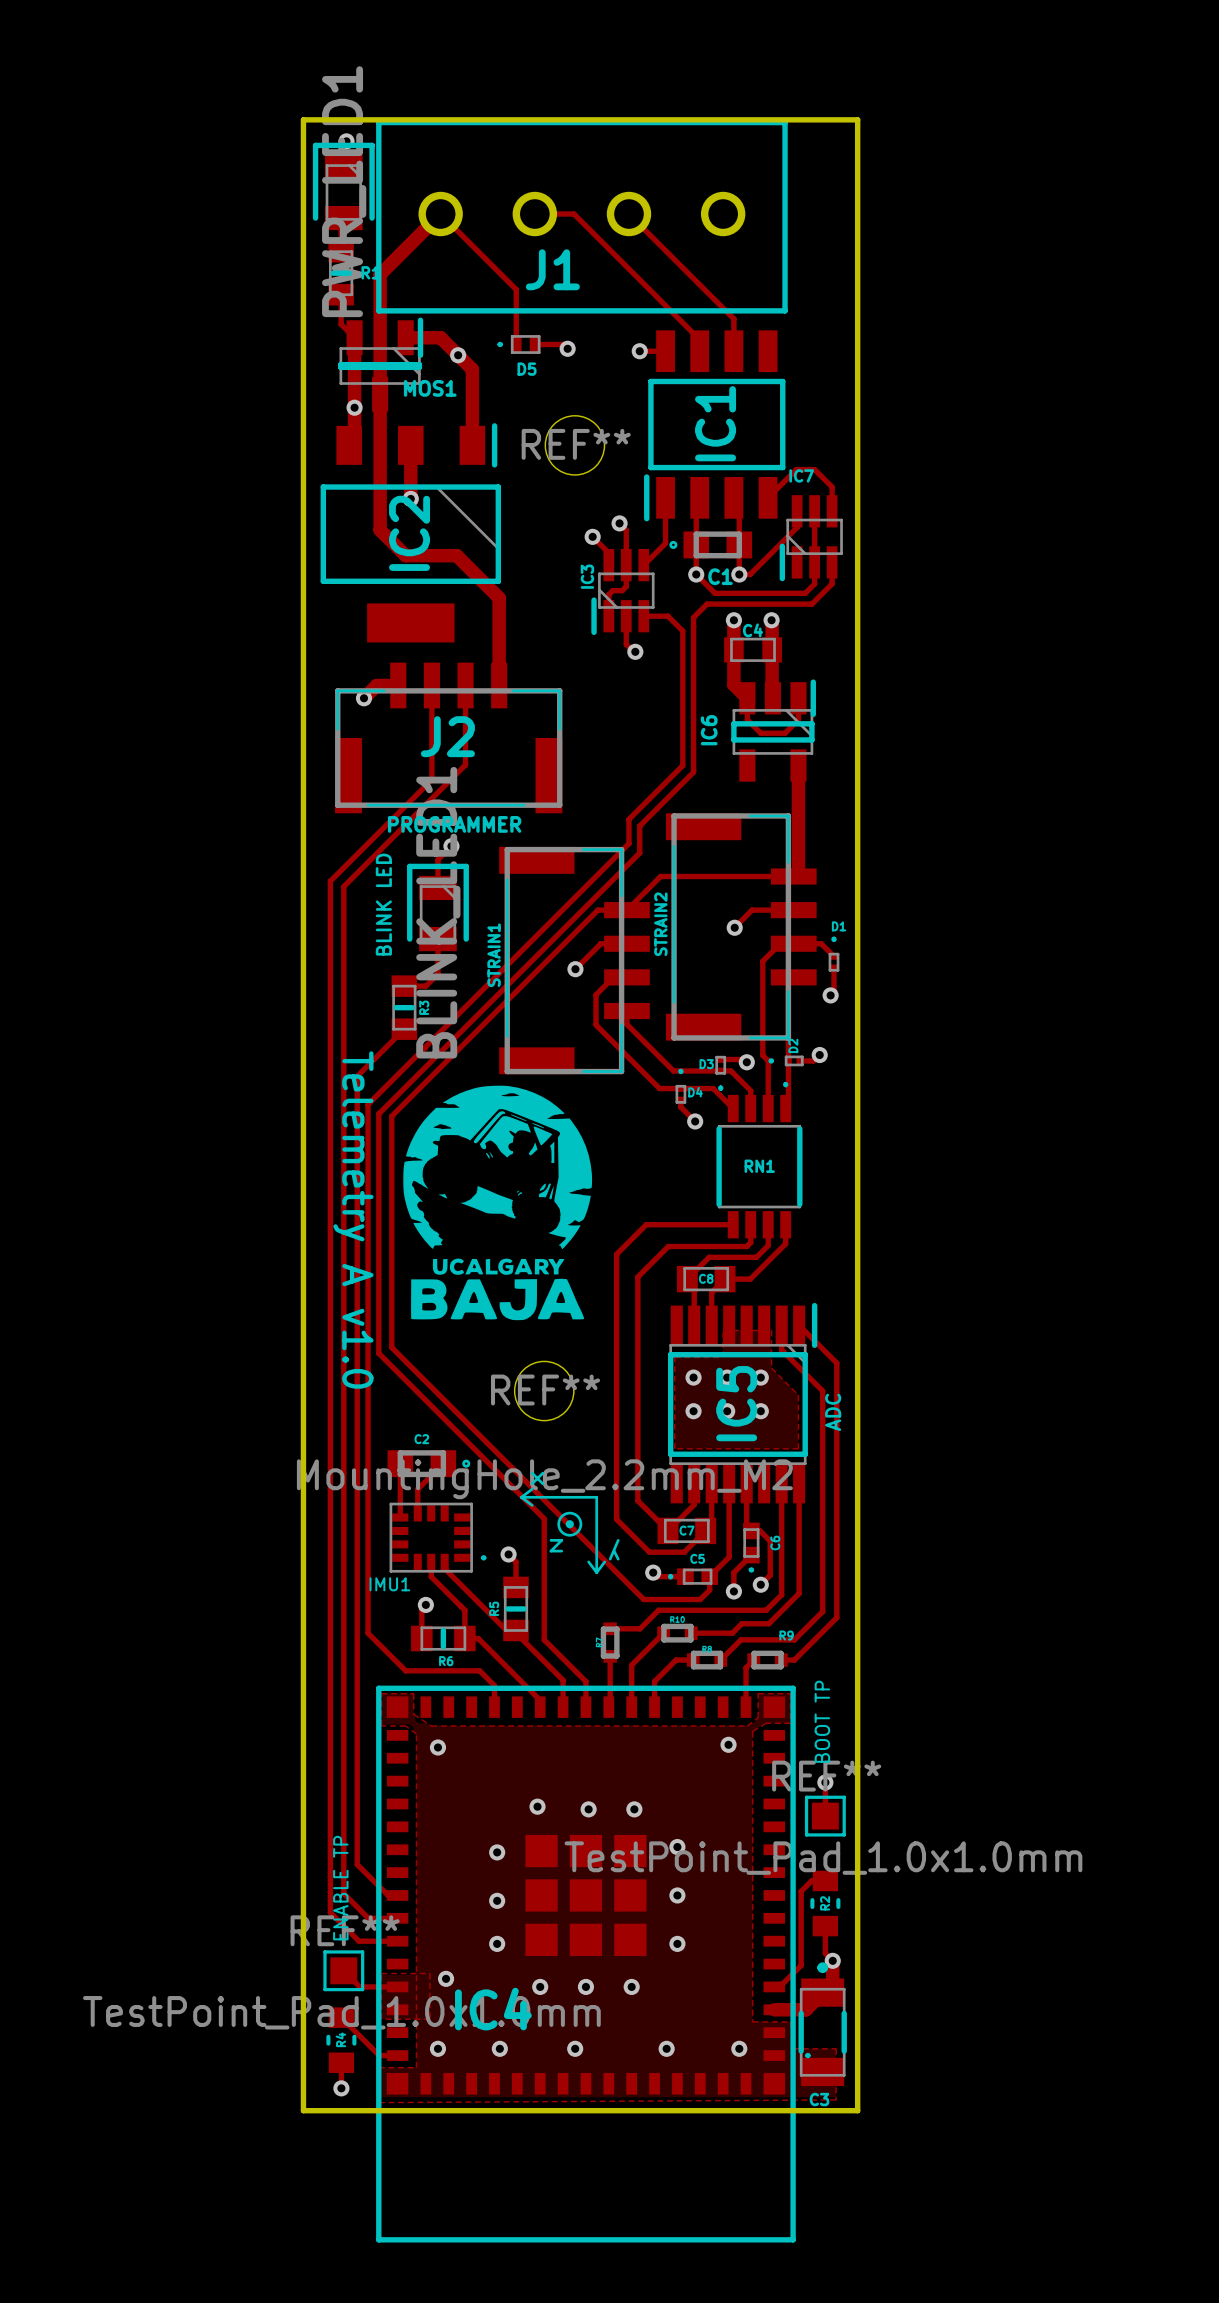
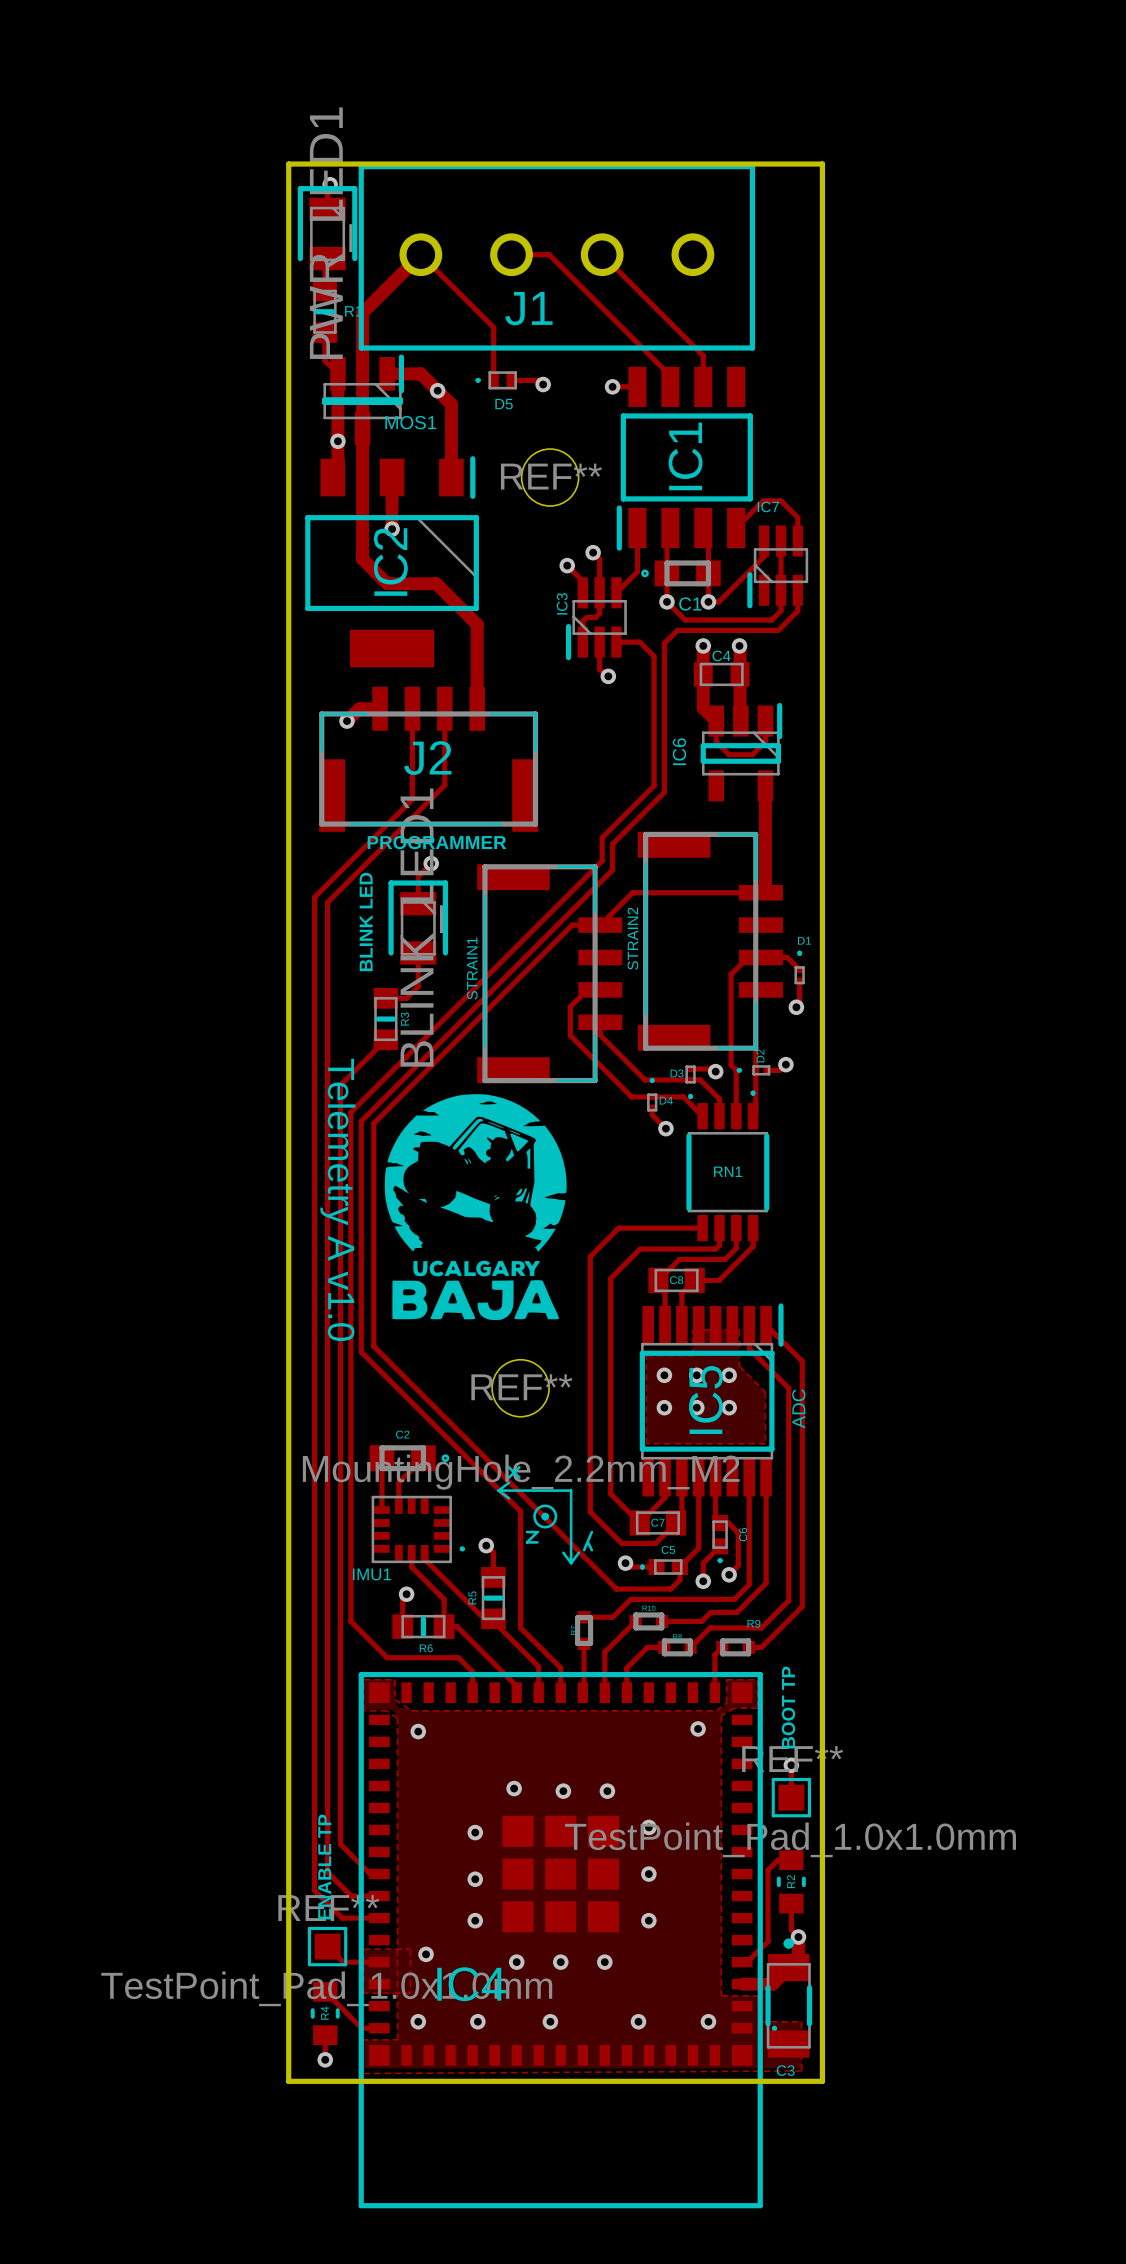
track: (793, 910) (752, 910) (733, 928) -> none
via: (734, 927) -> none
track: (626, 943) (600, 943) (574, 969) -> none
via: (575, 969) -> none

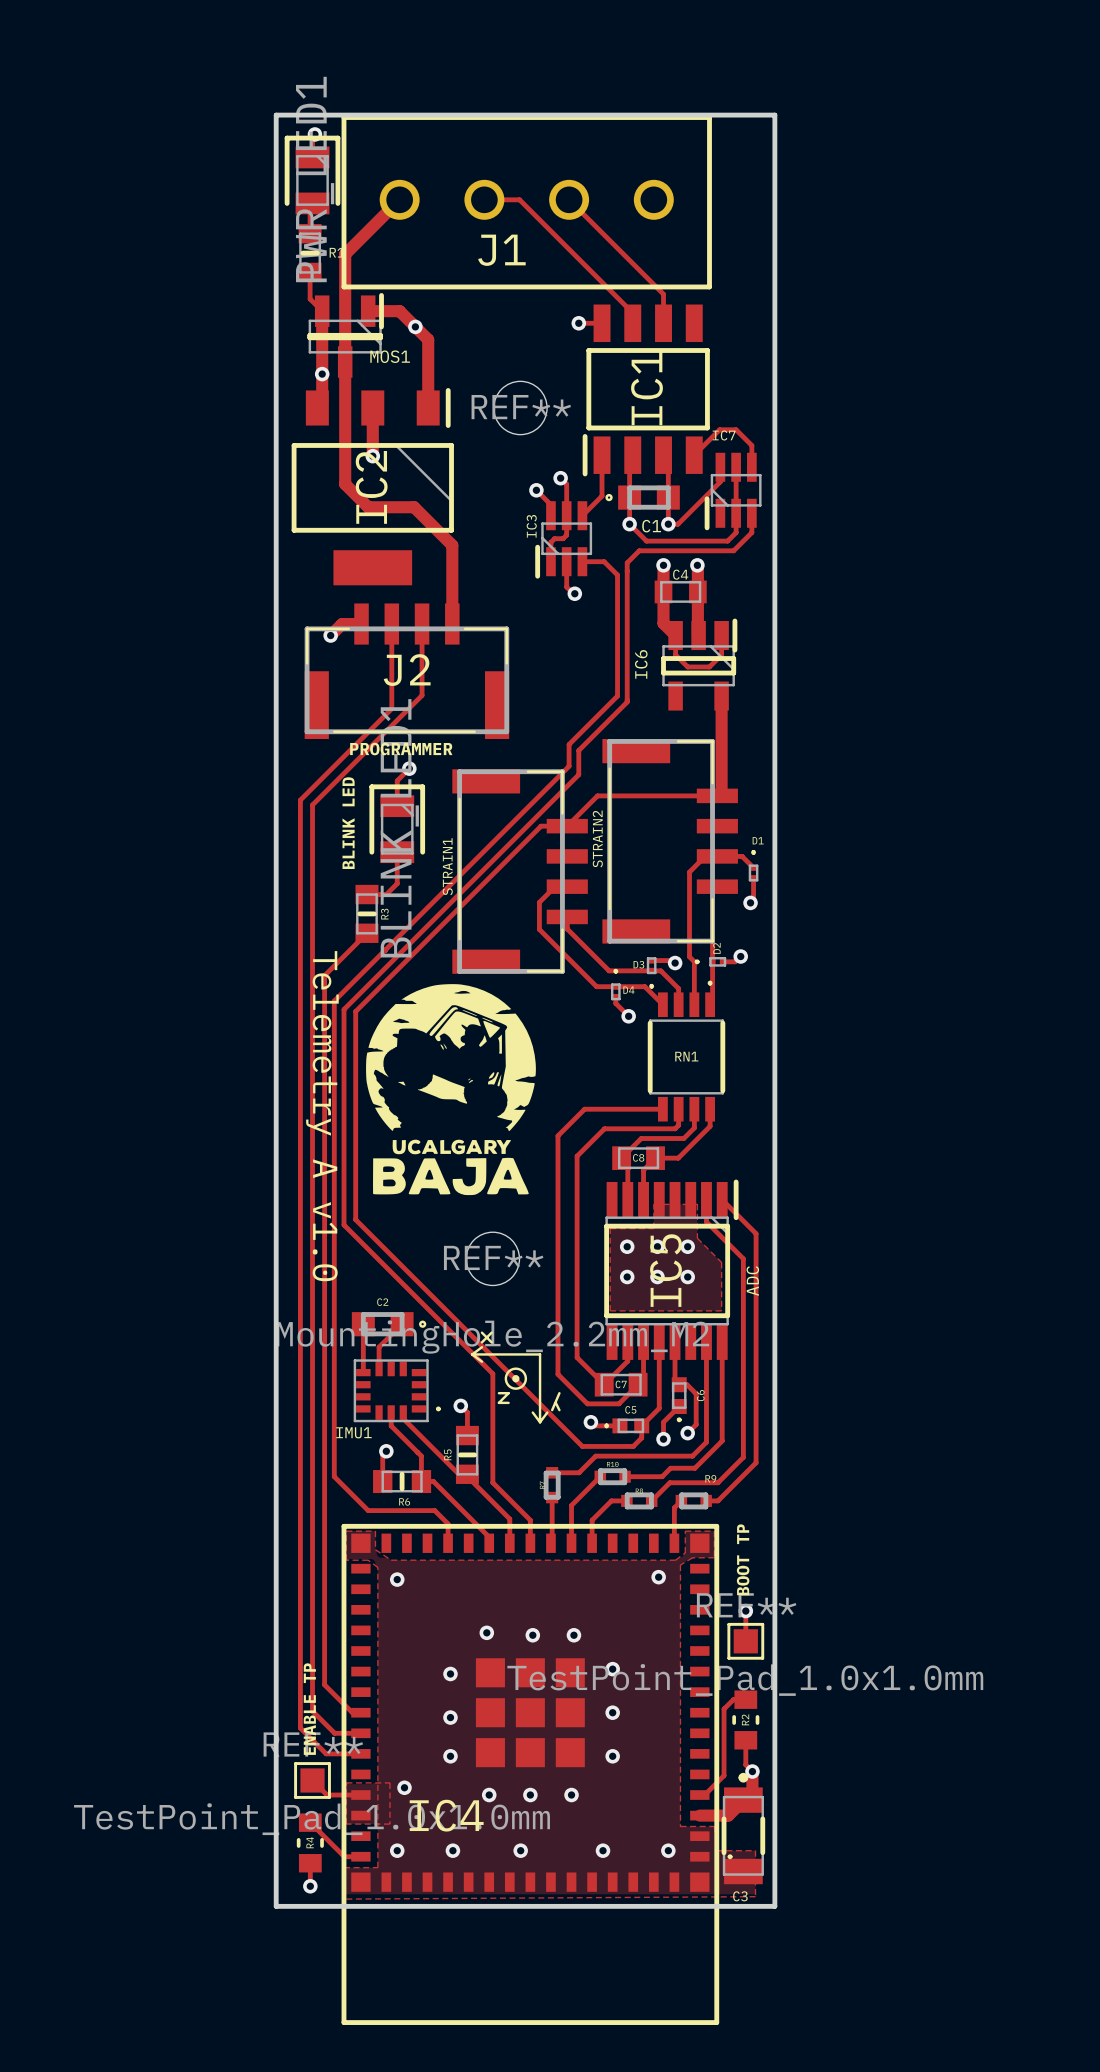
track: (420, 254) (493, 327) (493, 380) -> none
D5: (496, 380) -> none
track: (511, 380) (539, 380) (543, 384) -> none
via: (543, 384) -> none

